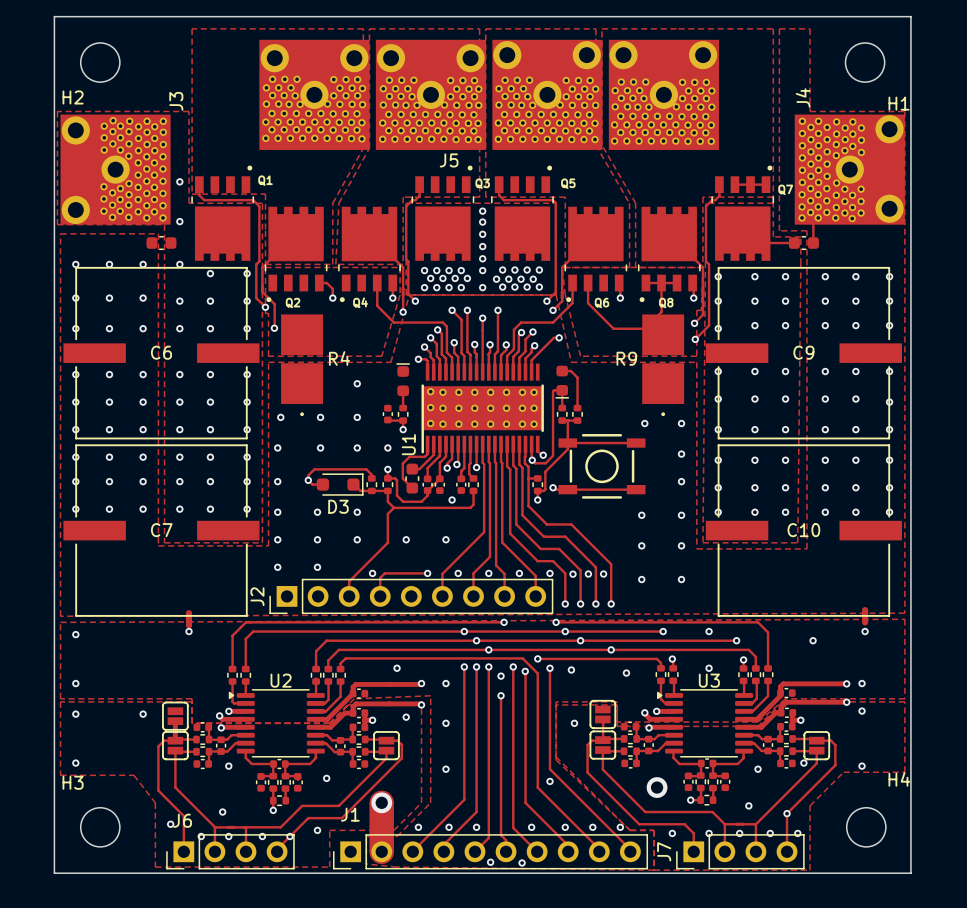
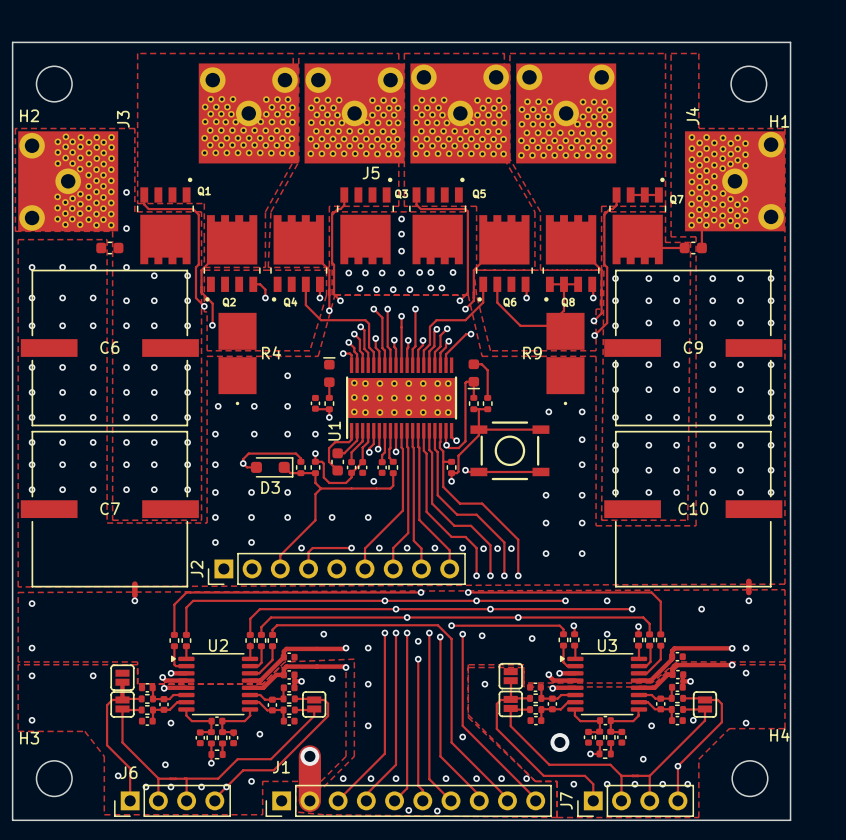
via: (482, 222) -> none
via: none -> (401, 234)
via: (482, 234) -> none
via: (482, 258) -> none
via: (436, 270) -> none
via: none -> (365, 272)
via: (449, 270) -> none
via: (527, 270) -> none
via: (430, 278) -> none
via: (442, 278) -> none
via: (455, 278) -> none
via: (467, 278) -> none
via: (496, 279) -> none
via: (508, 279) -> none
via: (521, 279) -> none
via: (533, 279) -> none
via: (424, 287) -> none
via: (449, 287) -> none
via: (461, 287) -> none
via: (482, 287) -> none
via: (502, 287) -> none
via: (539, 287) -> none
via: none -> (376, 289)
via: none -> (393, 289)
via: none -> (409, 289)

